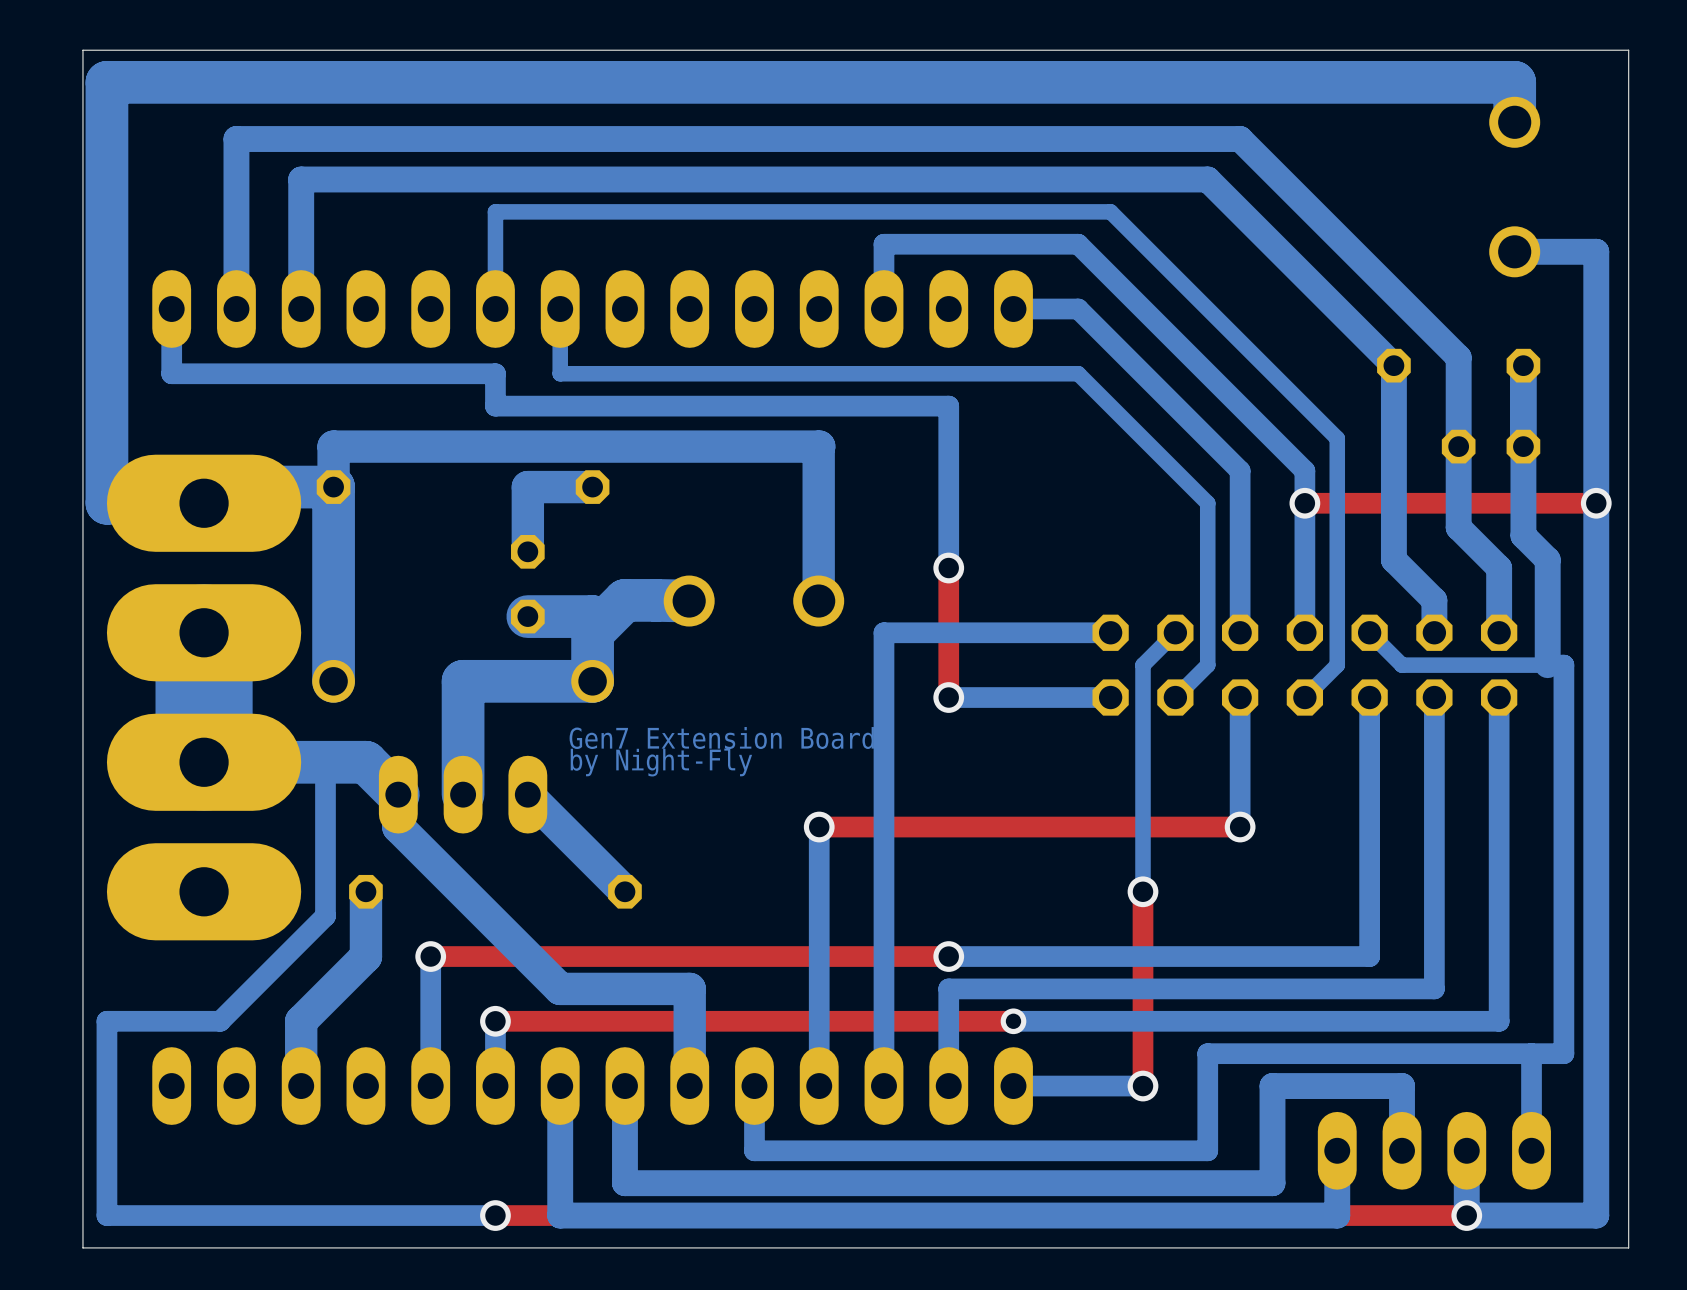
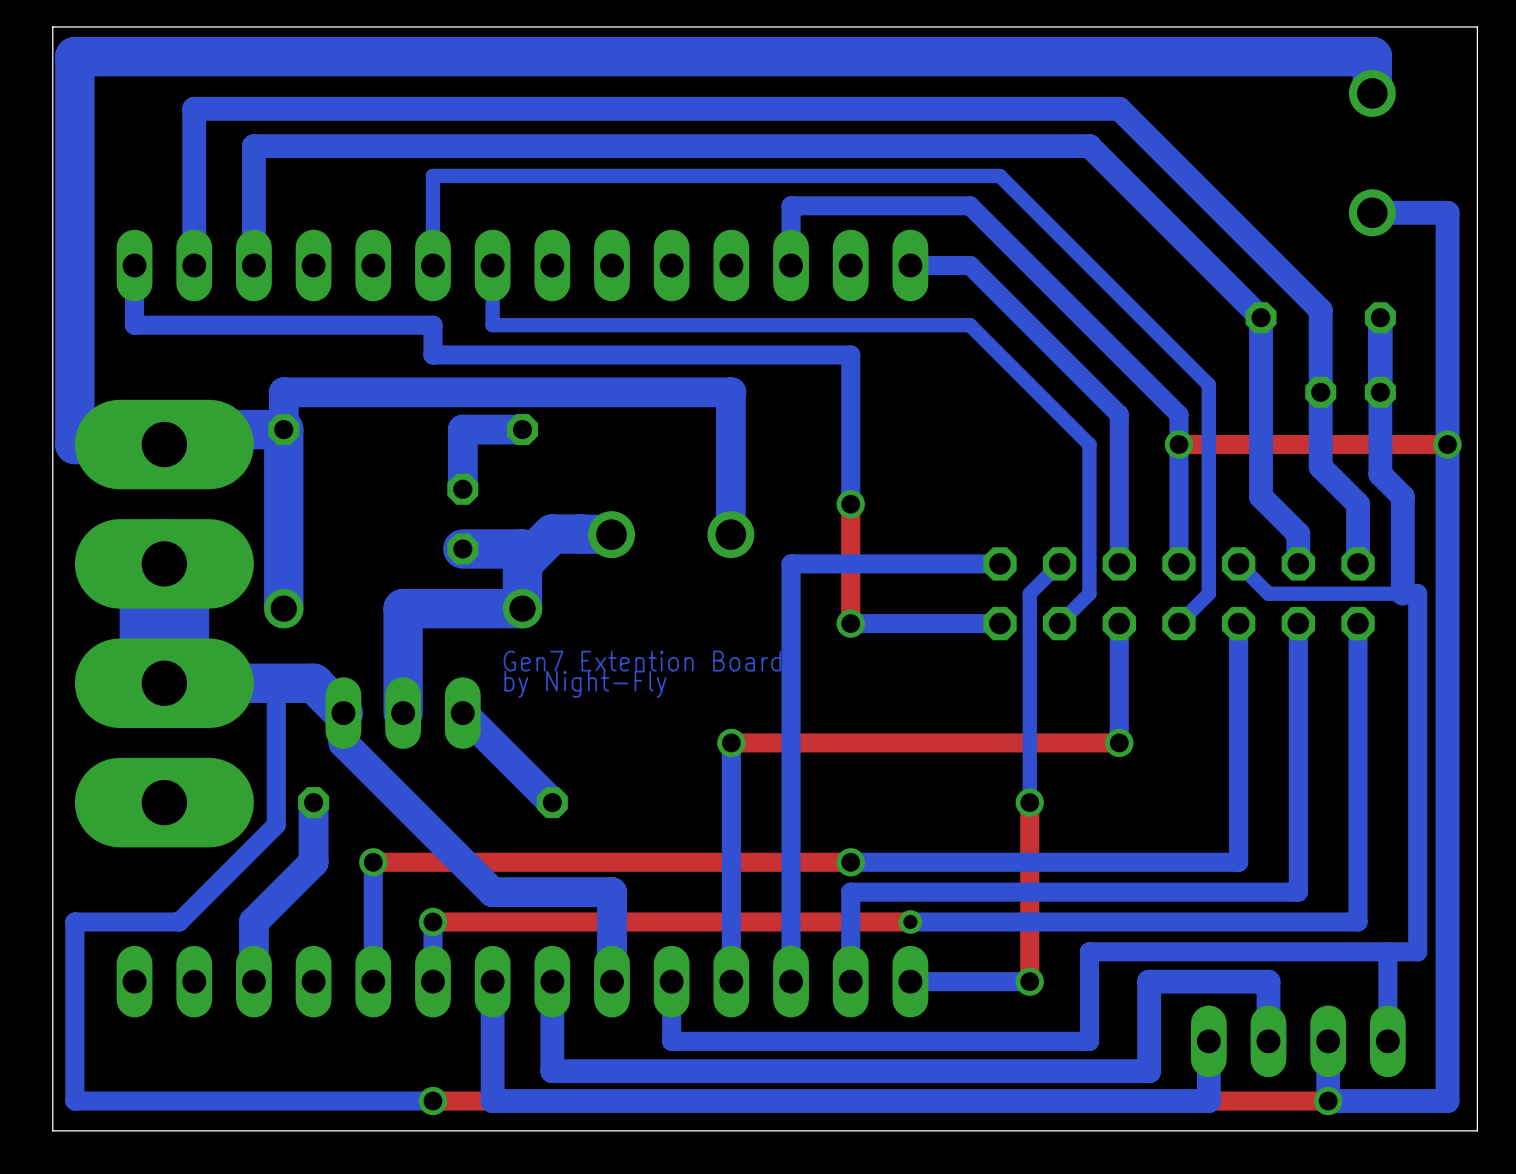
text: Gen7 Extension Board (721, 738) -> Gen7 Extention Board (642, 661)

